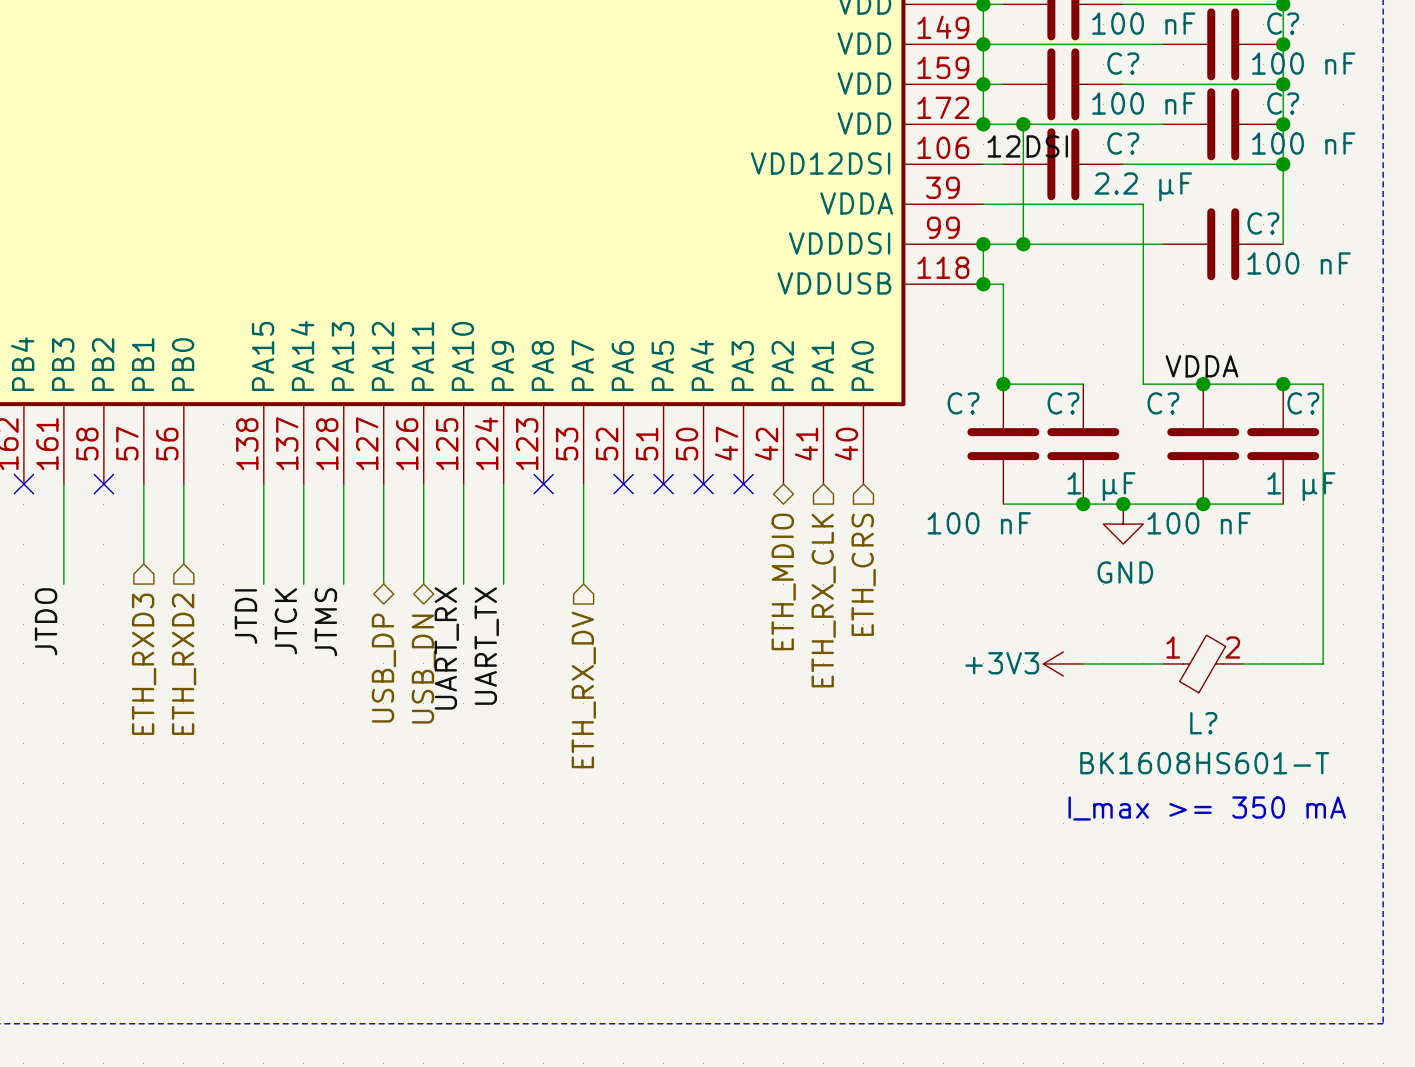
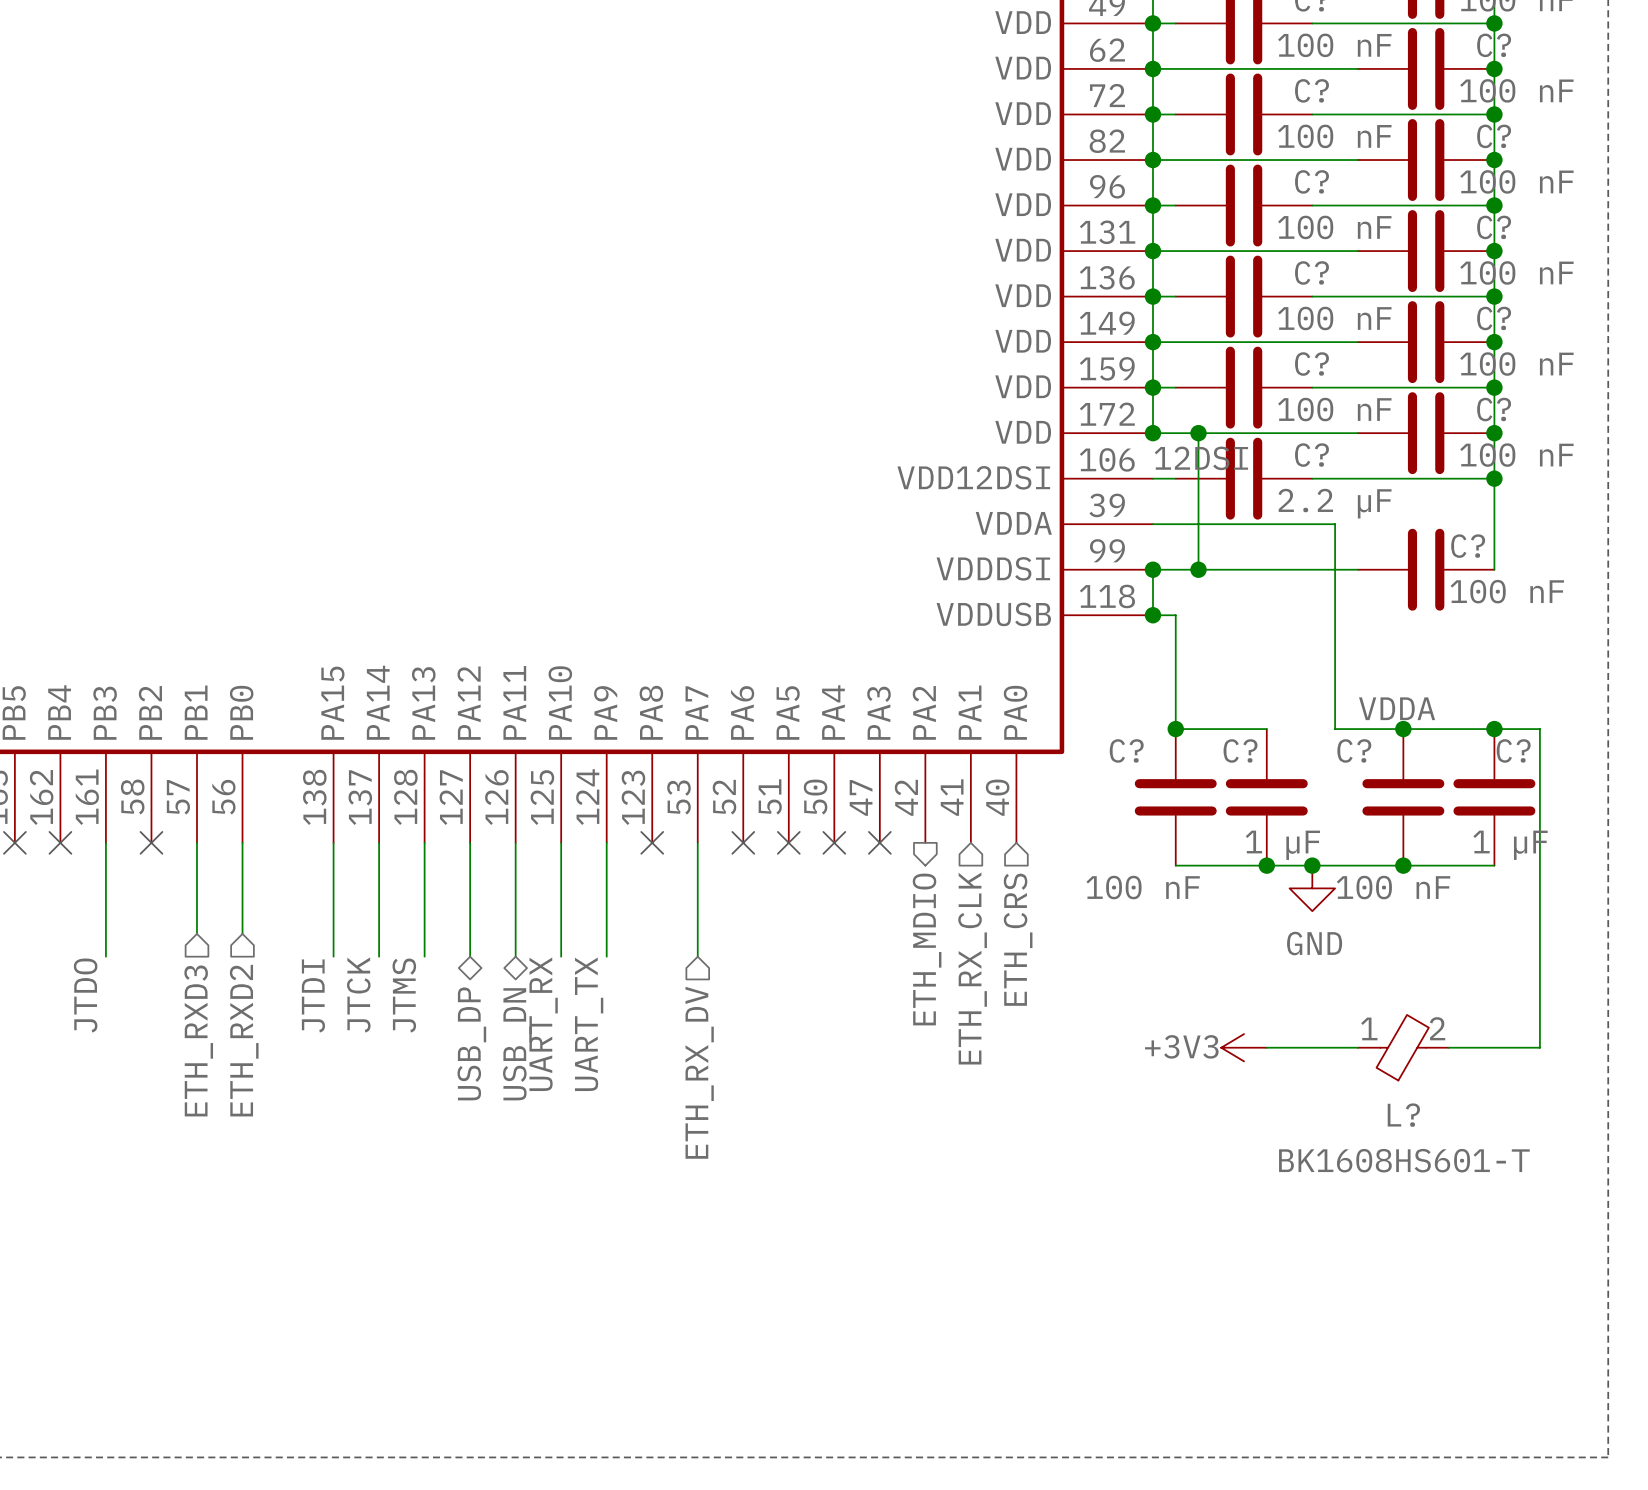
hierarchical label shape: bidirectional (783, 581) -> output (927, 949)
text: I_max >= 350 mA (1207, 808) -> none

